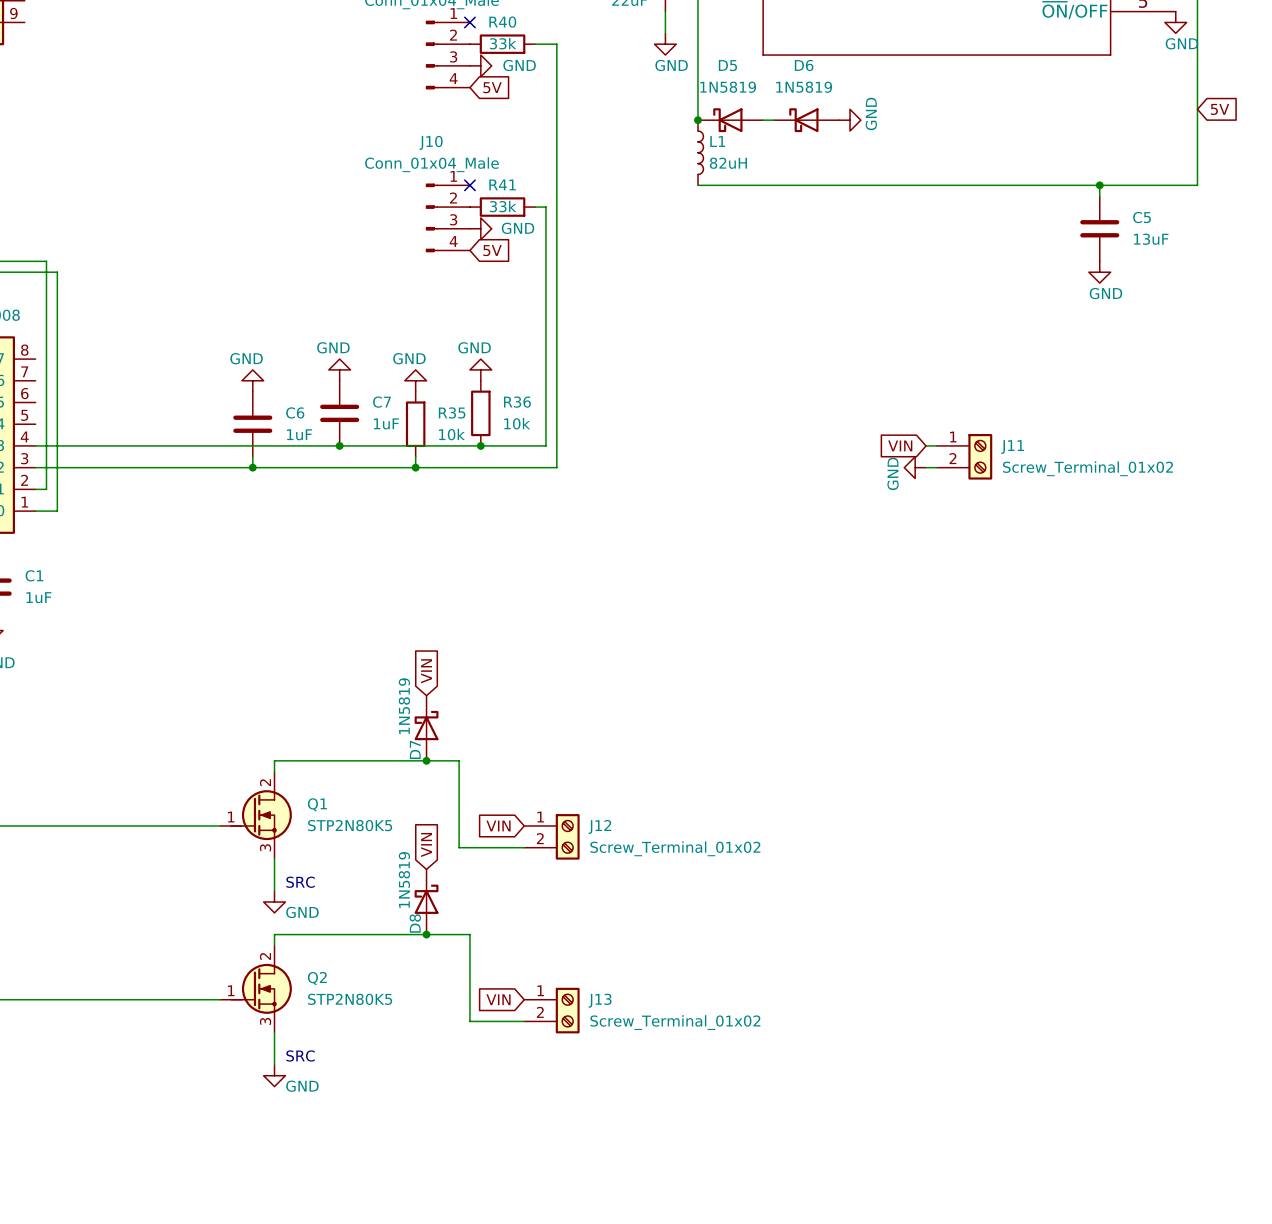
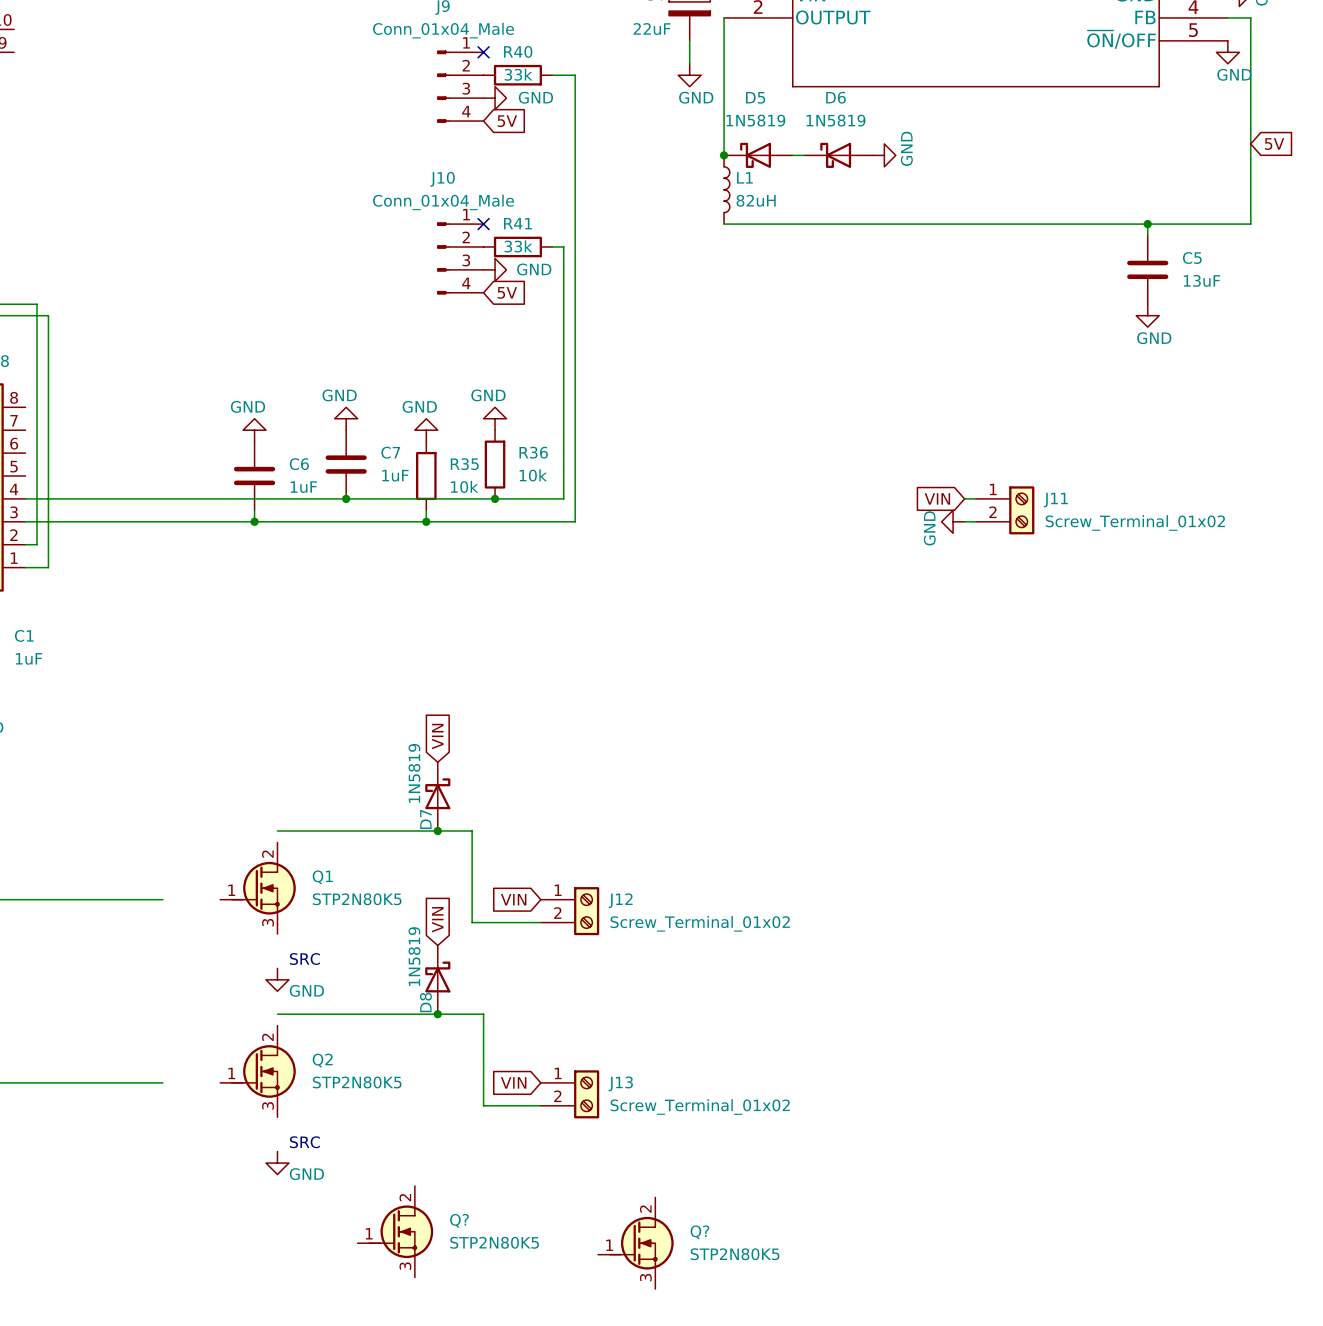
wire: (274, 760) (274, 771) -> none
wire: (165, 825) (220, 825) -> none
wire: (274, 858) (274, 891) -> none
wire: (274, 934) (274, 945) -> none
wire: (165, 999) (220, 999) -> none
wire: (274, 1032) (274, 1064) -> none
Q?: none -> STP2N80K5 (395, 1231)
Q?: none -> STP2N80K5 (635, 1243)

